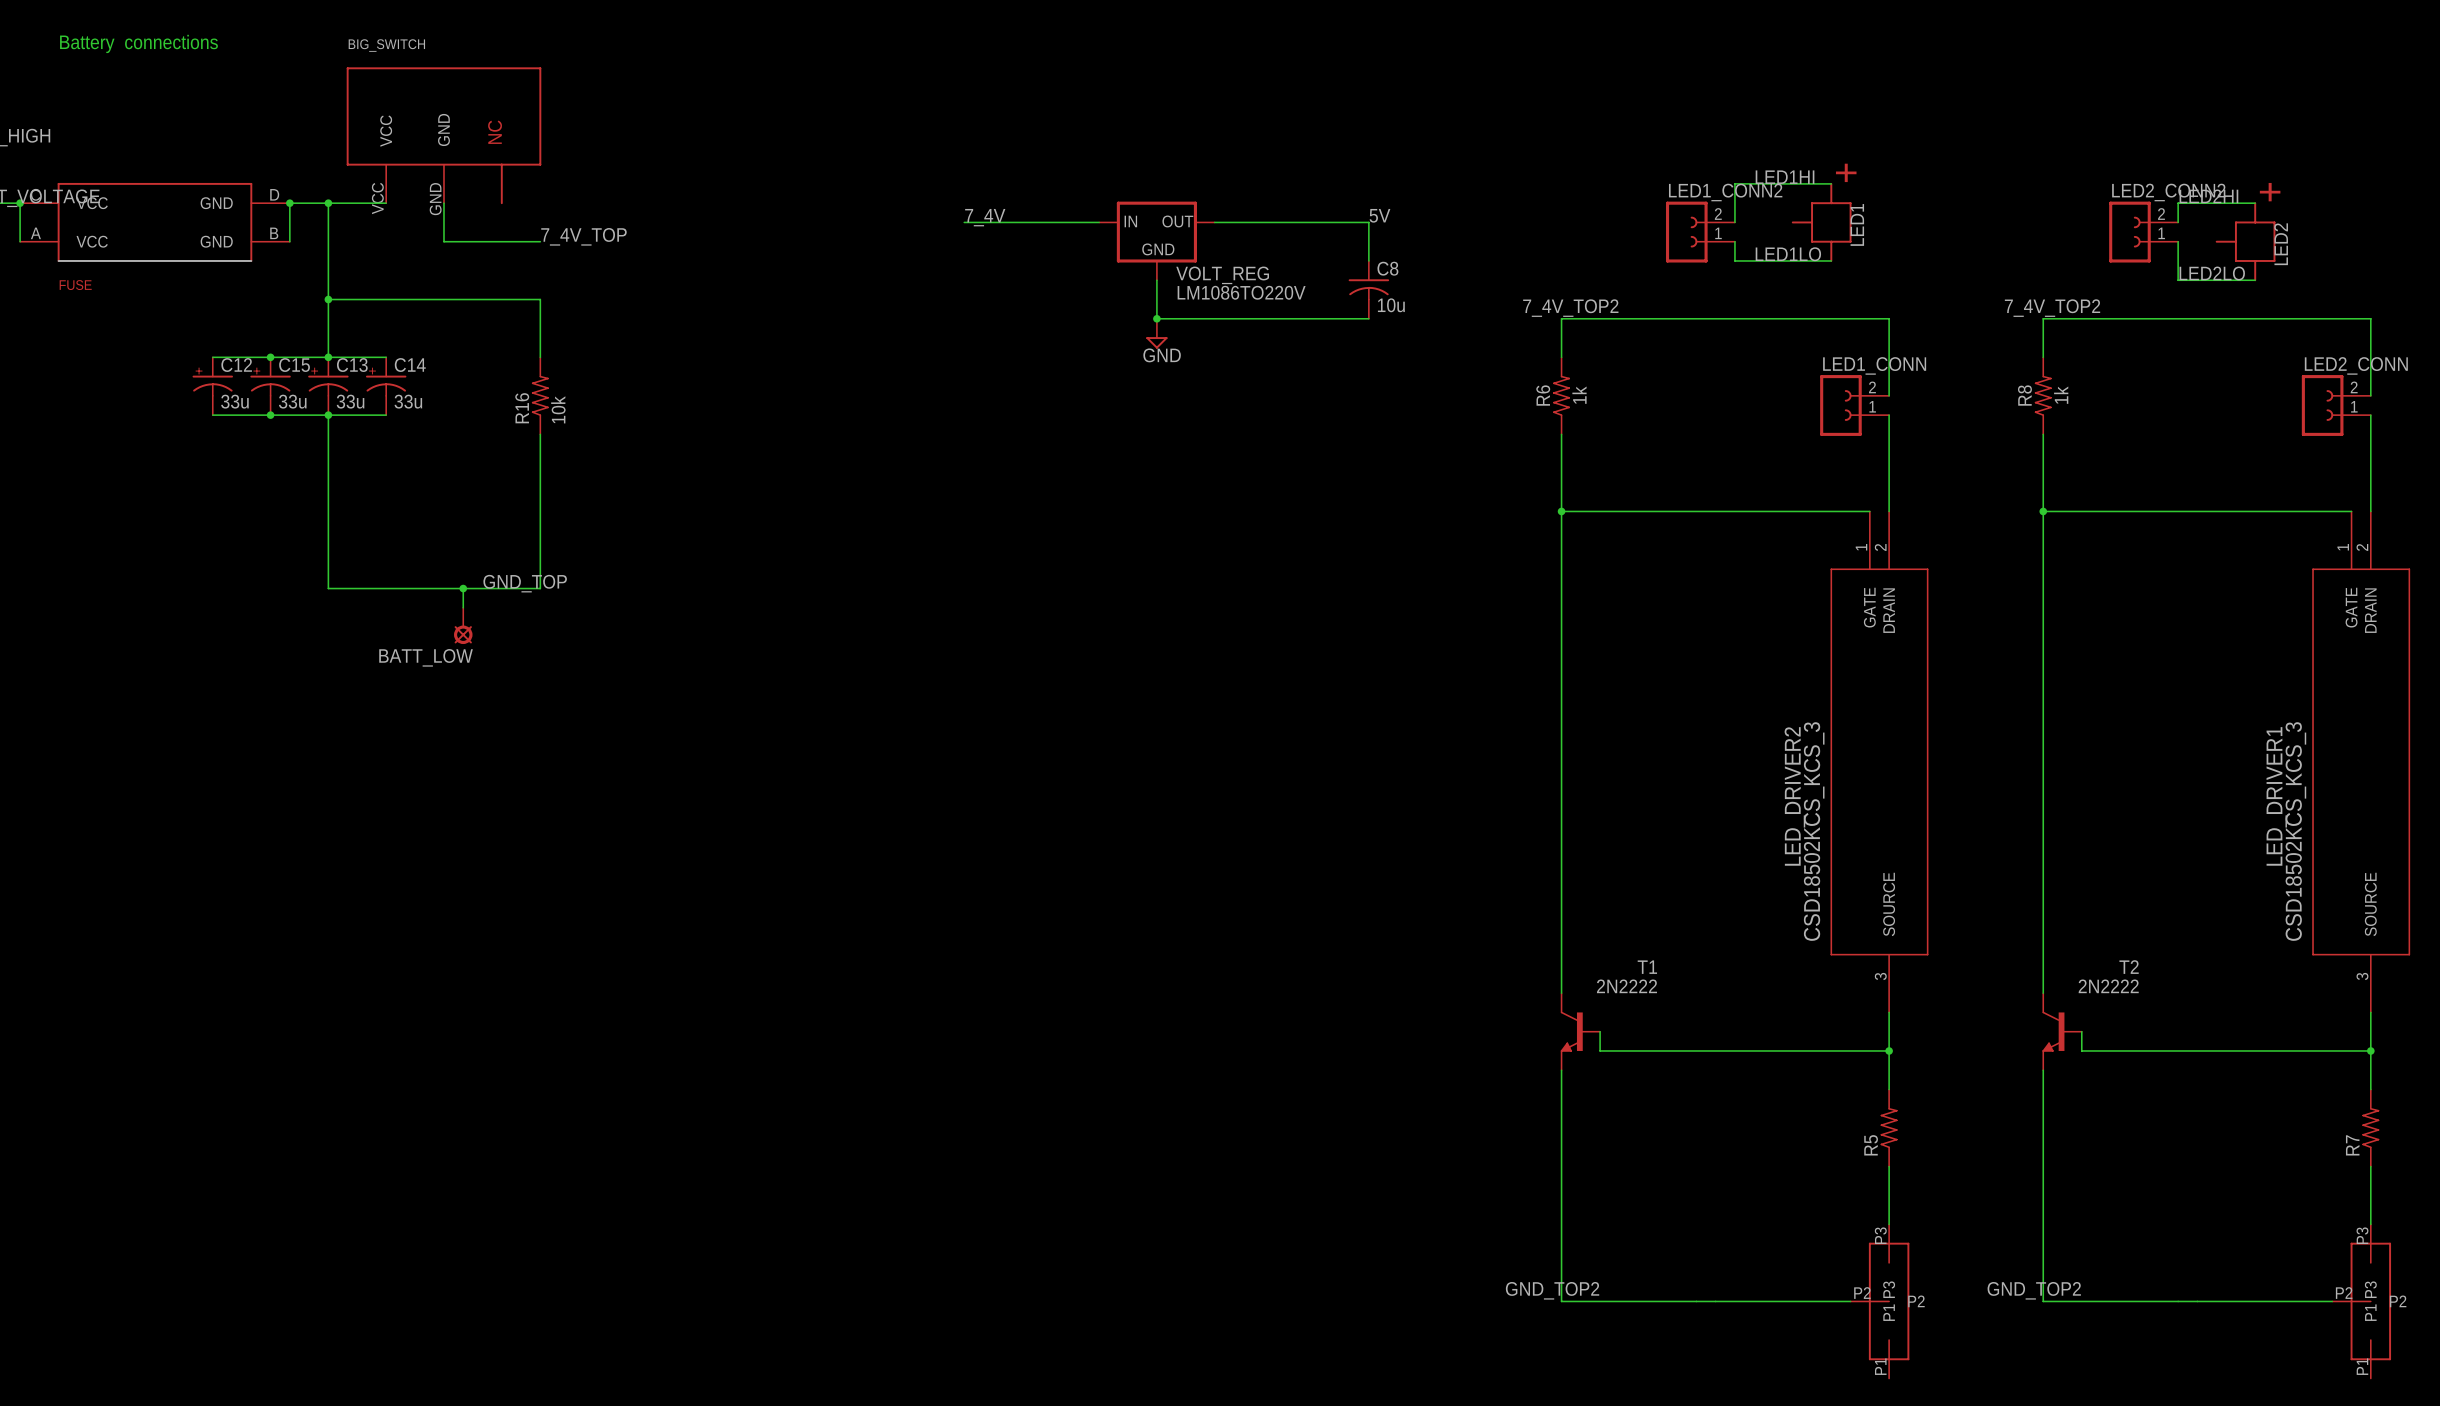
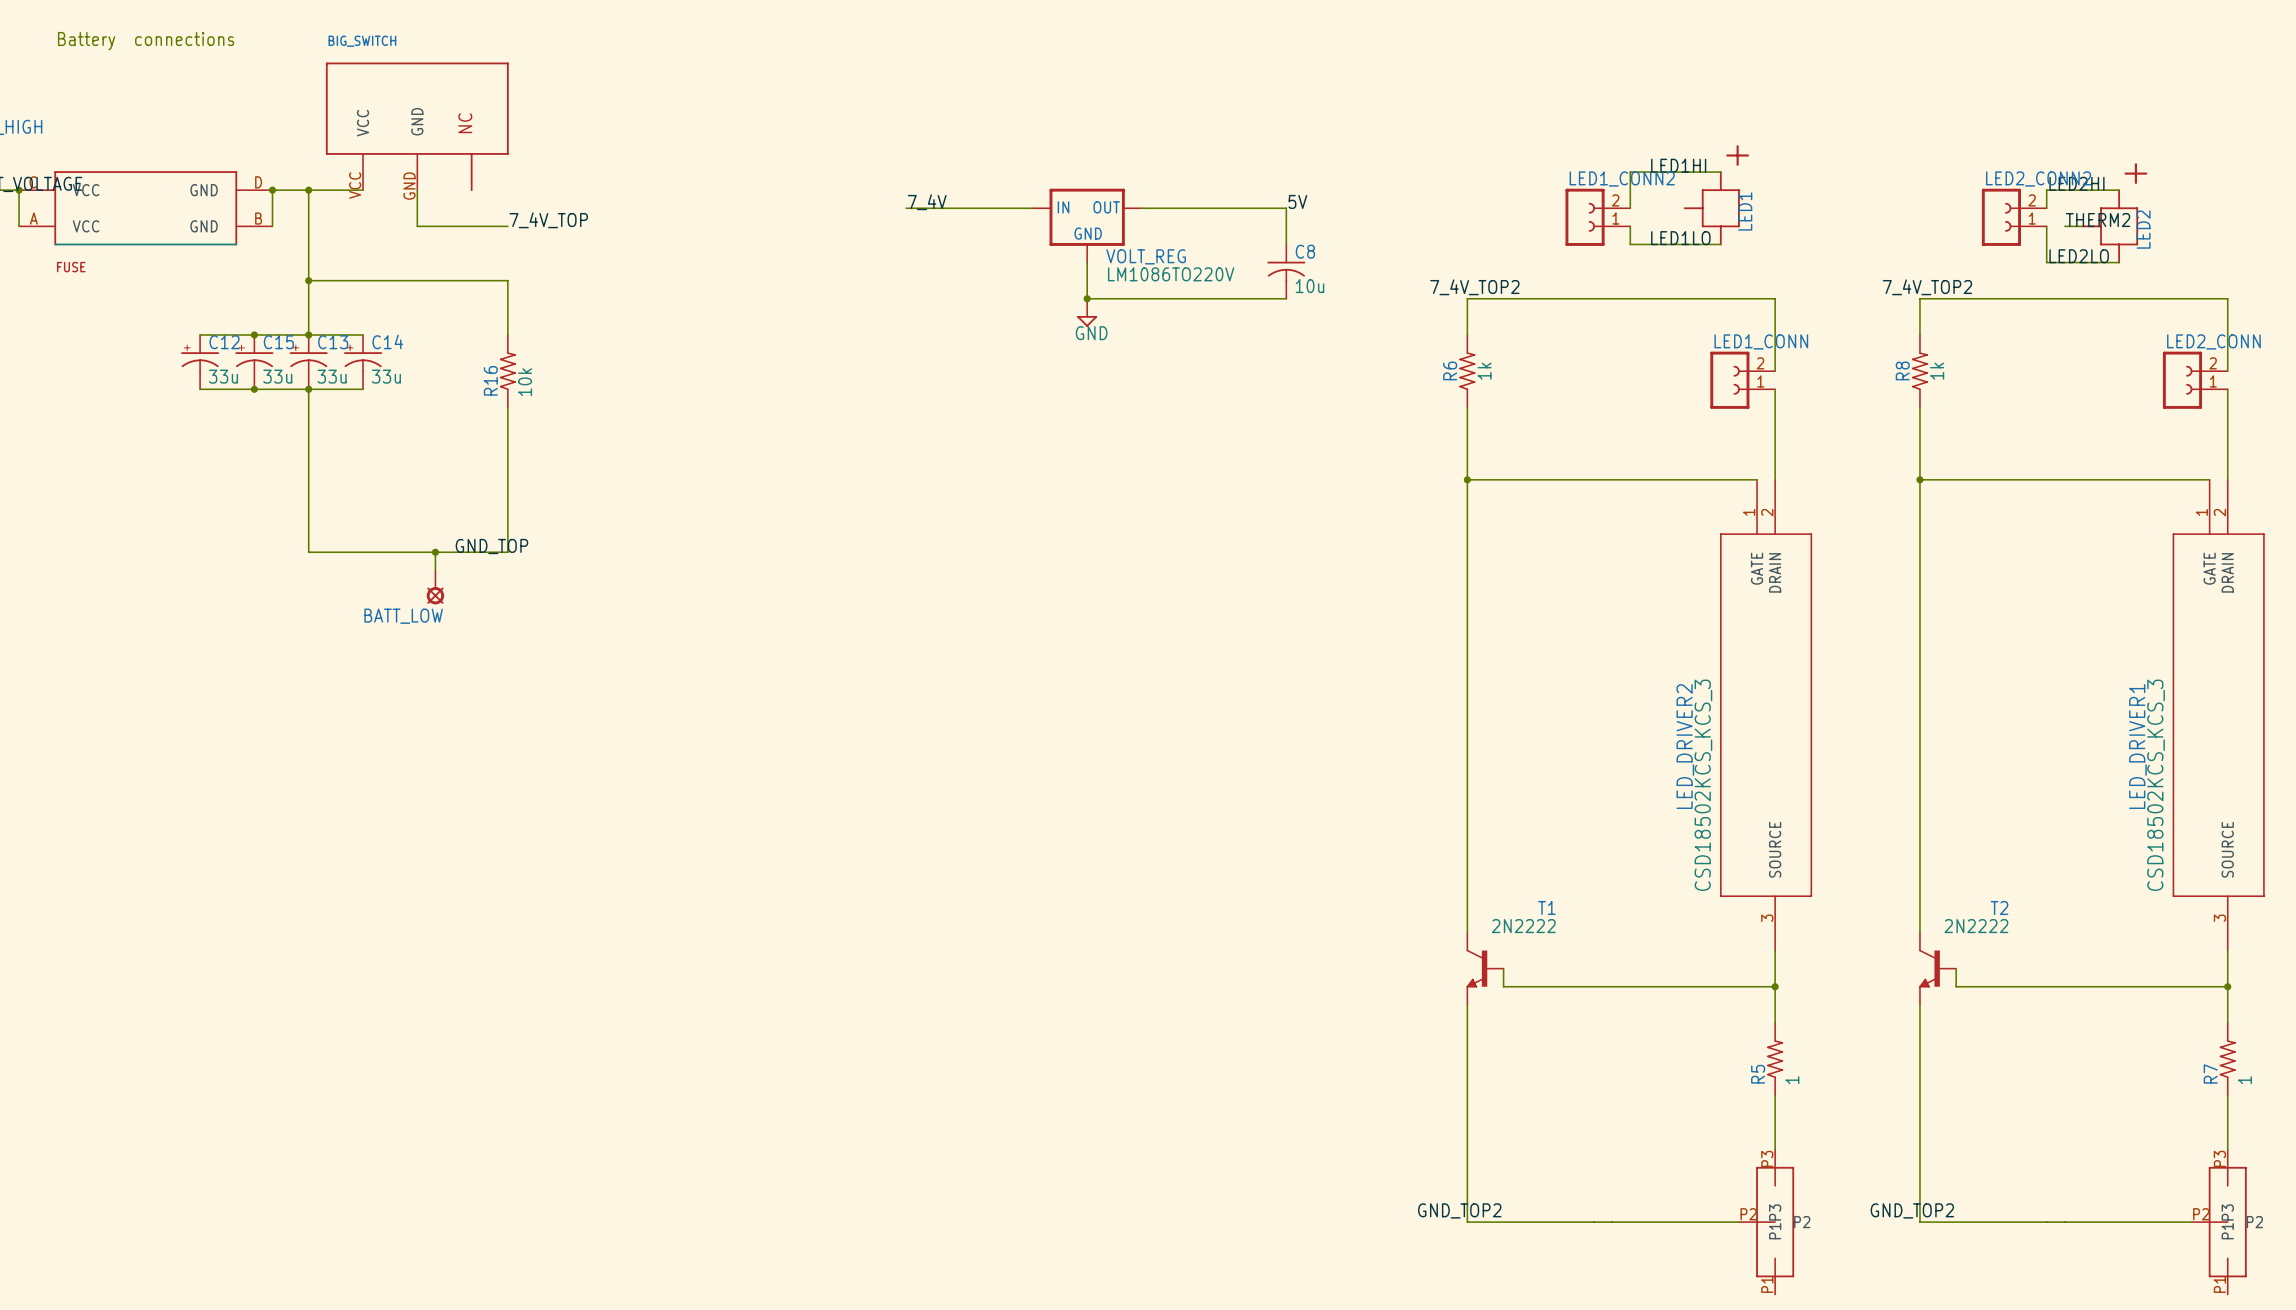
label: none -> THERM2 (2098, 220)
wire: none -> (2064, 226) (2082, 226)
R5 value: none -> 1 (1792, 1080)
R7 value: none -> 1 (2244, 1080)

